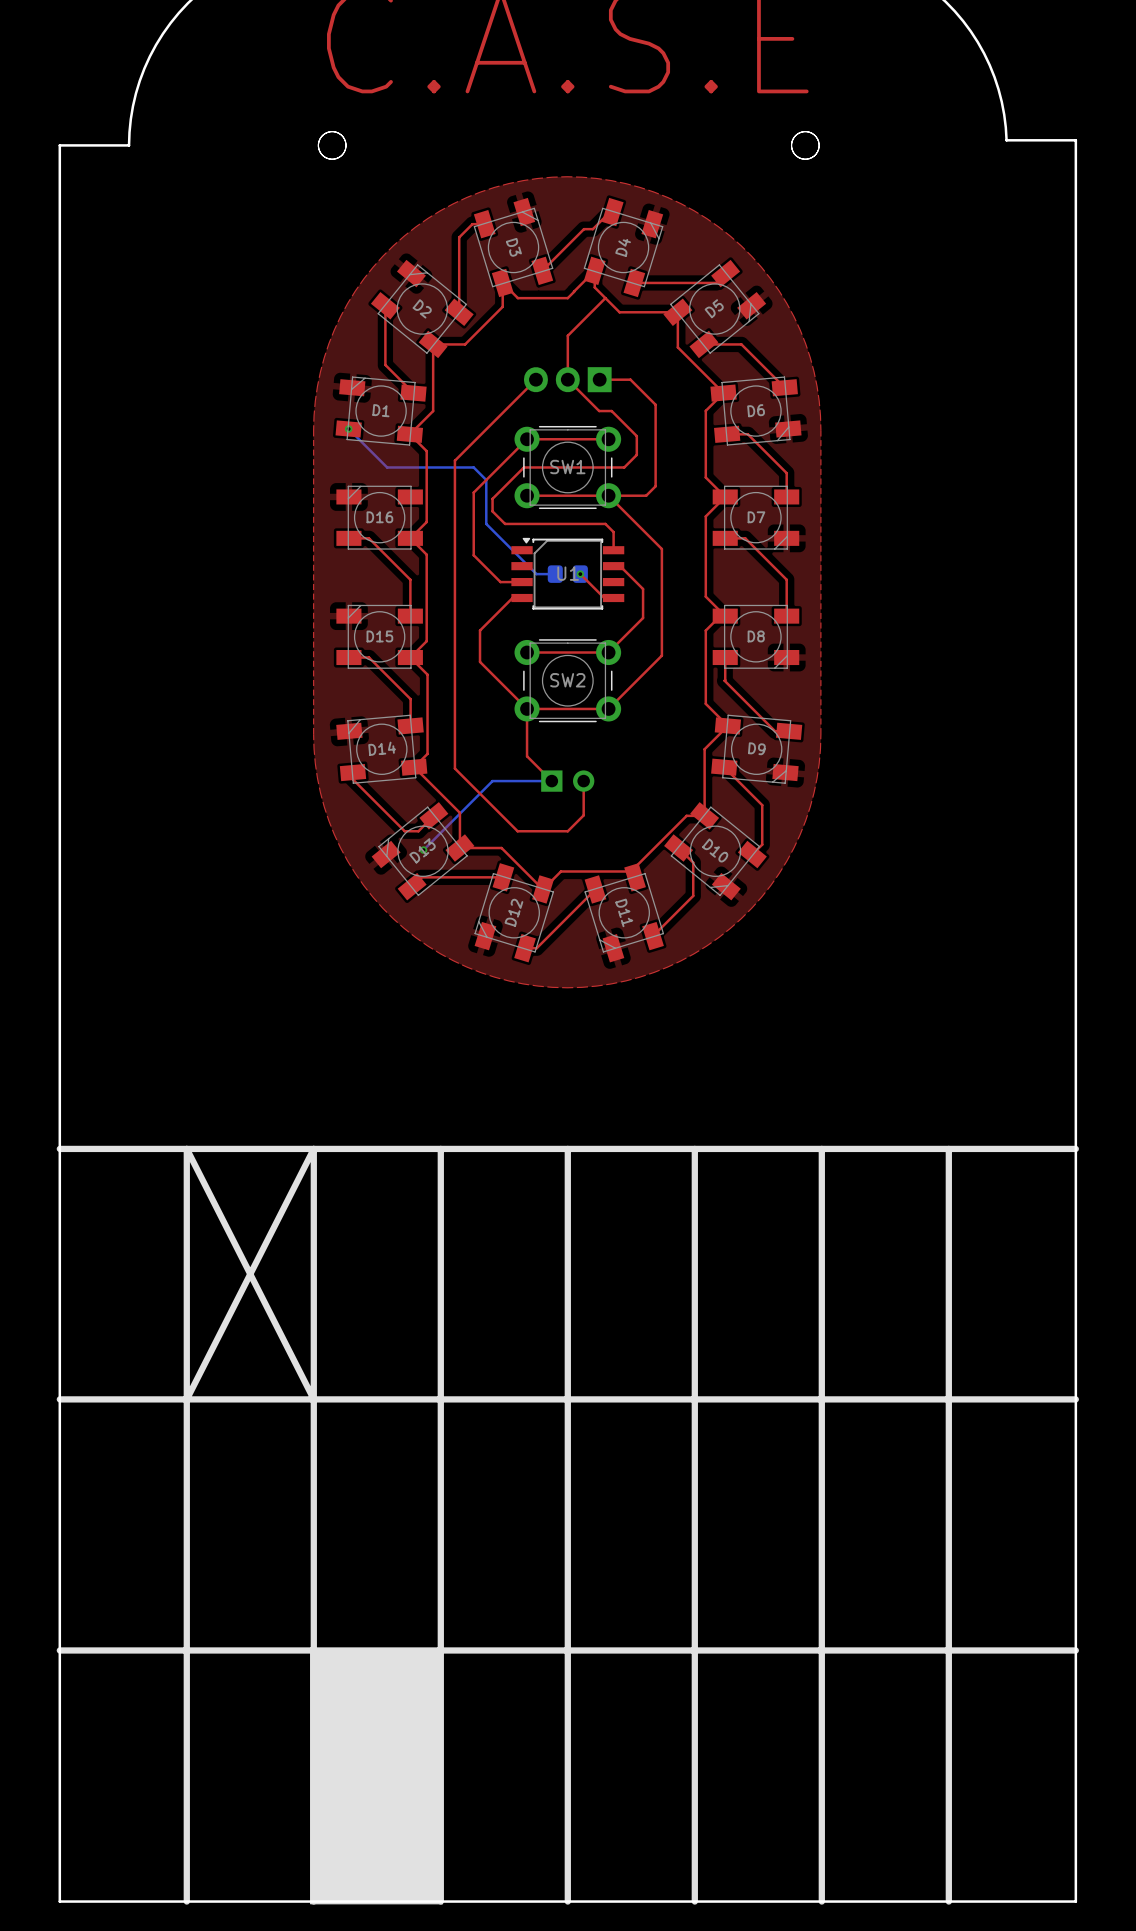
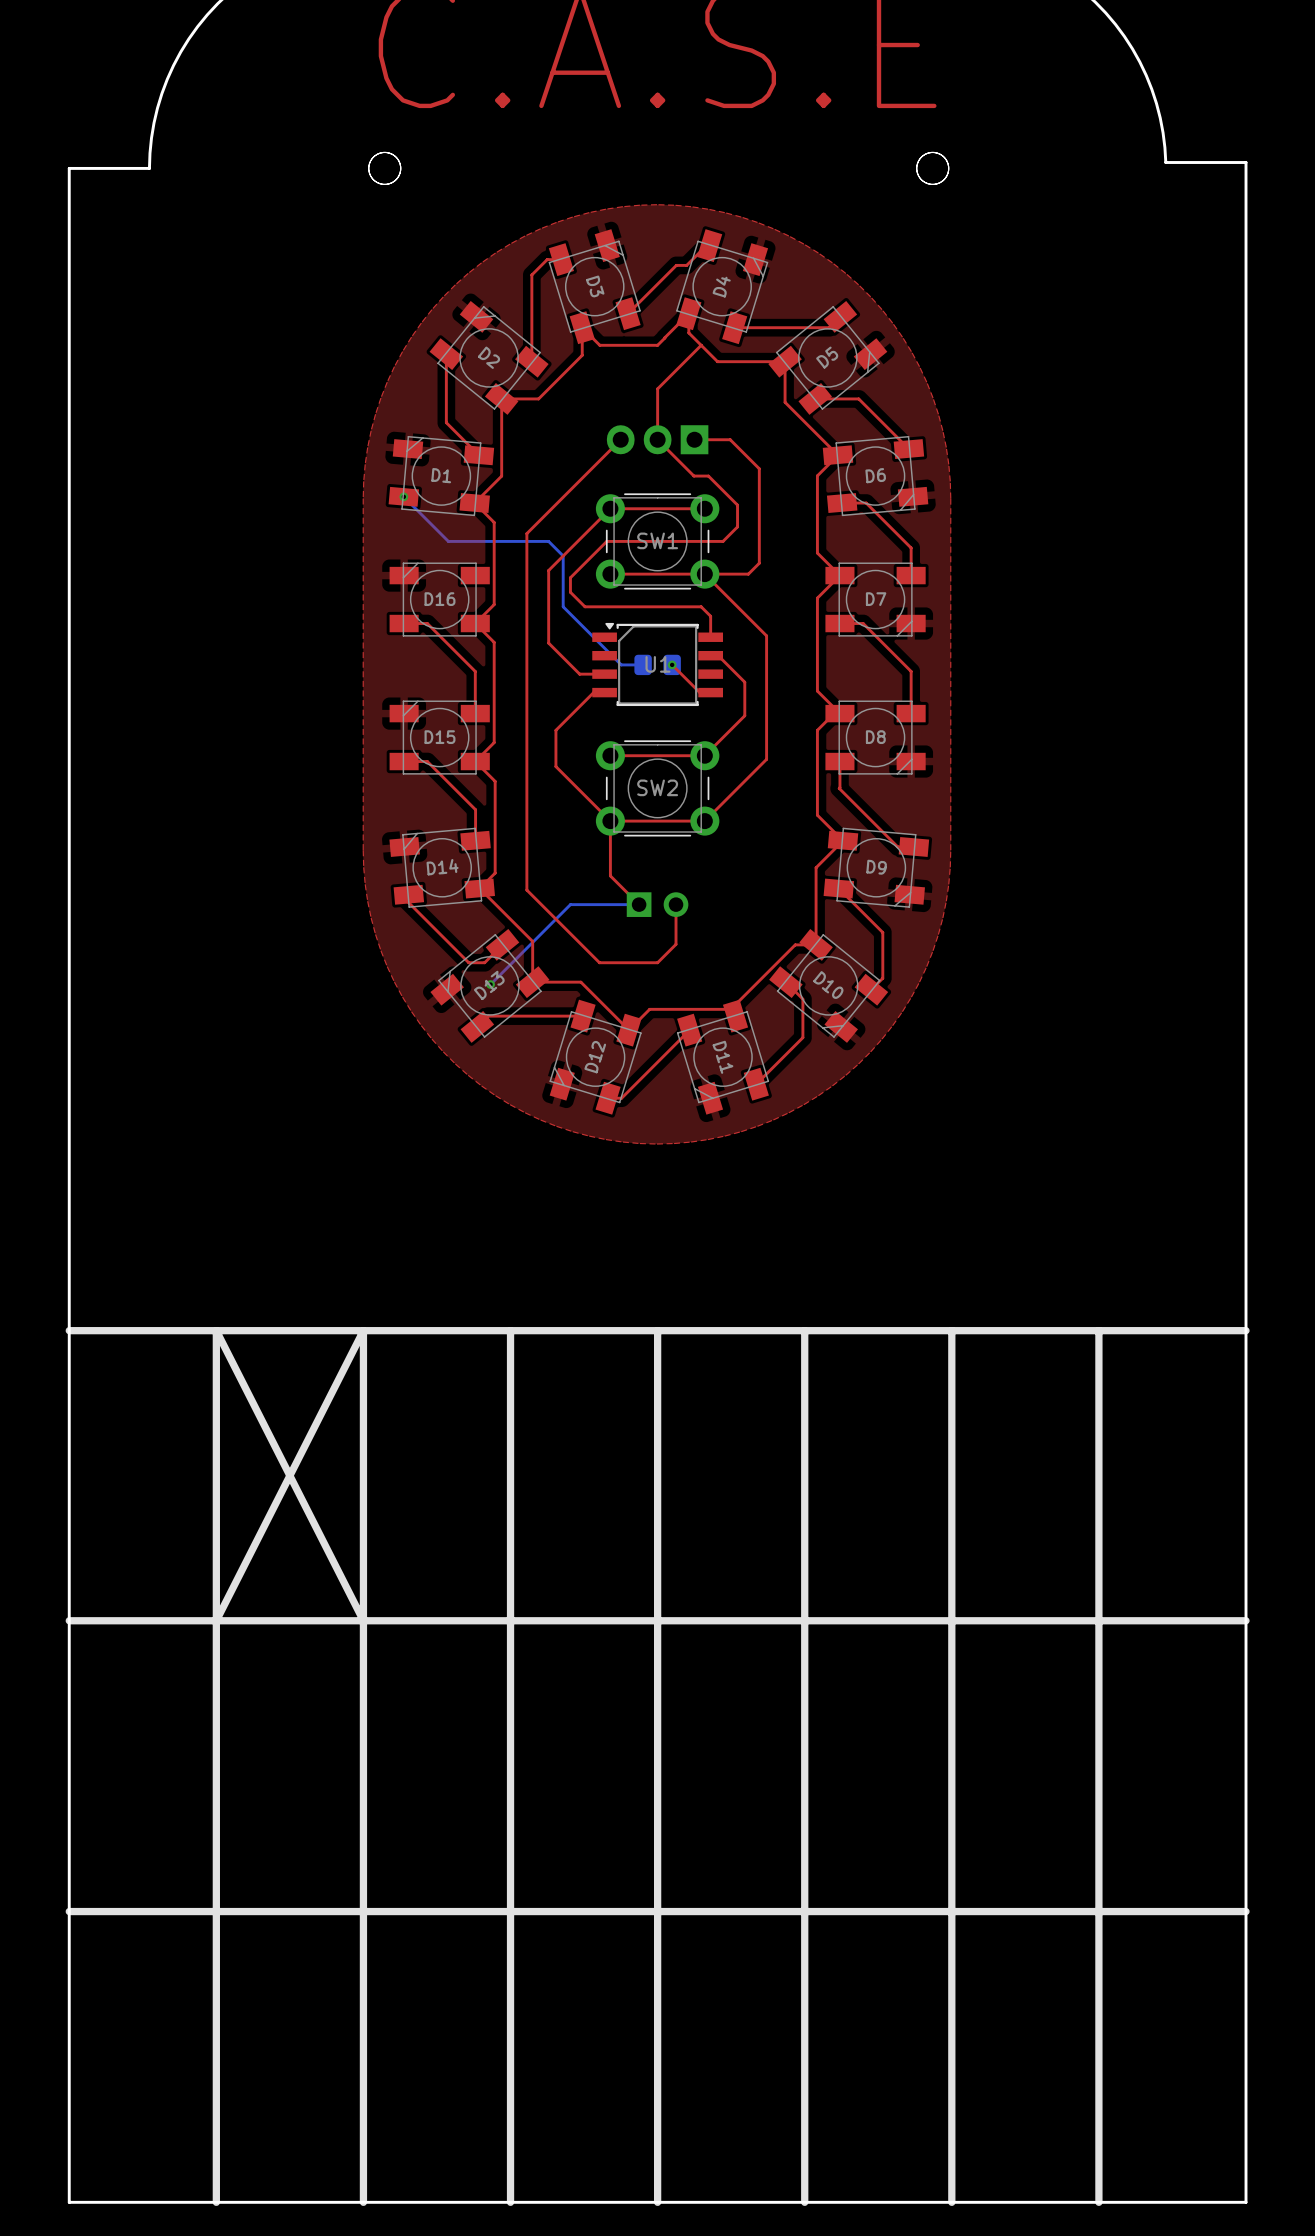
drawing: [310, 1652, 444, 1905] -> none

